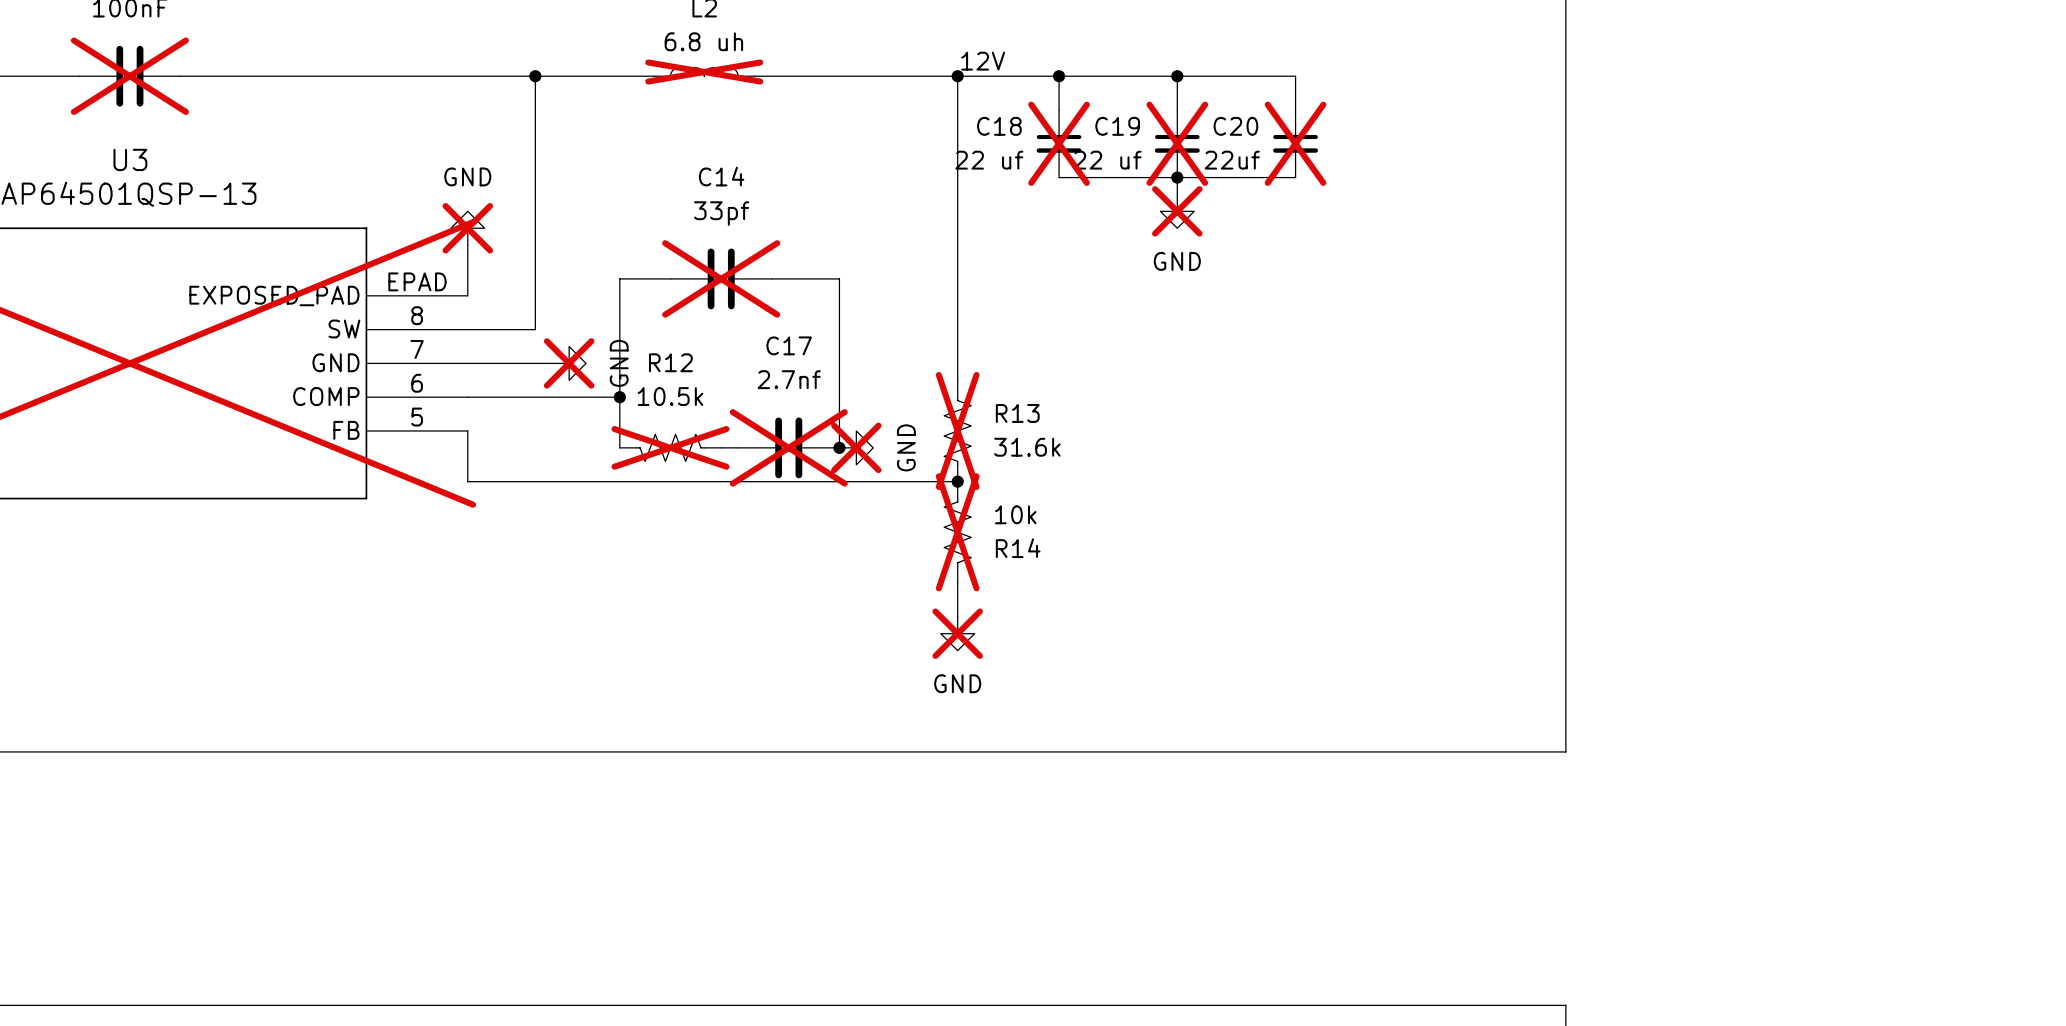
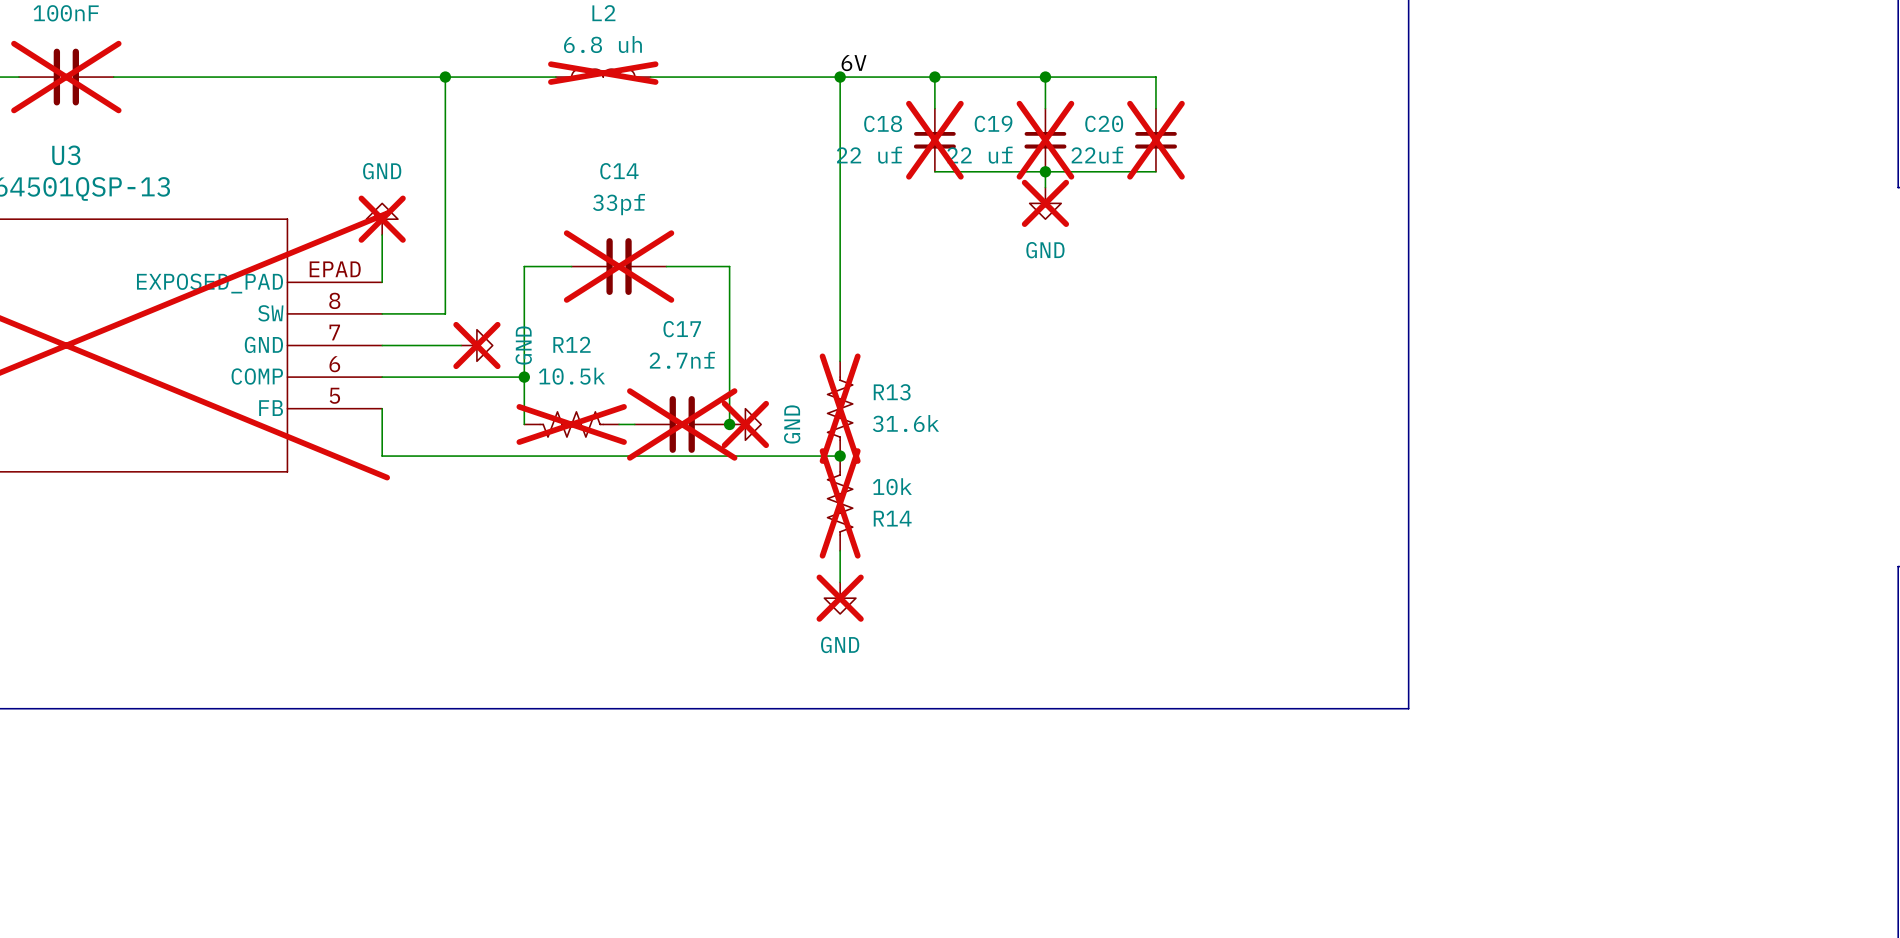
label: 12V (983, 61) -> 6V (854, 63)

